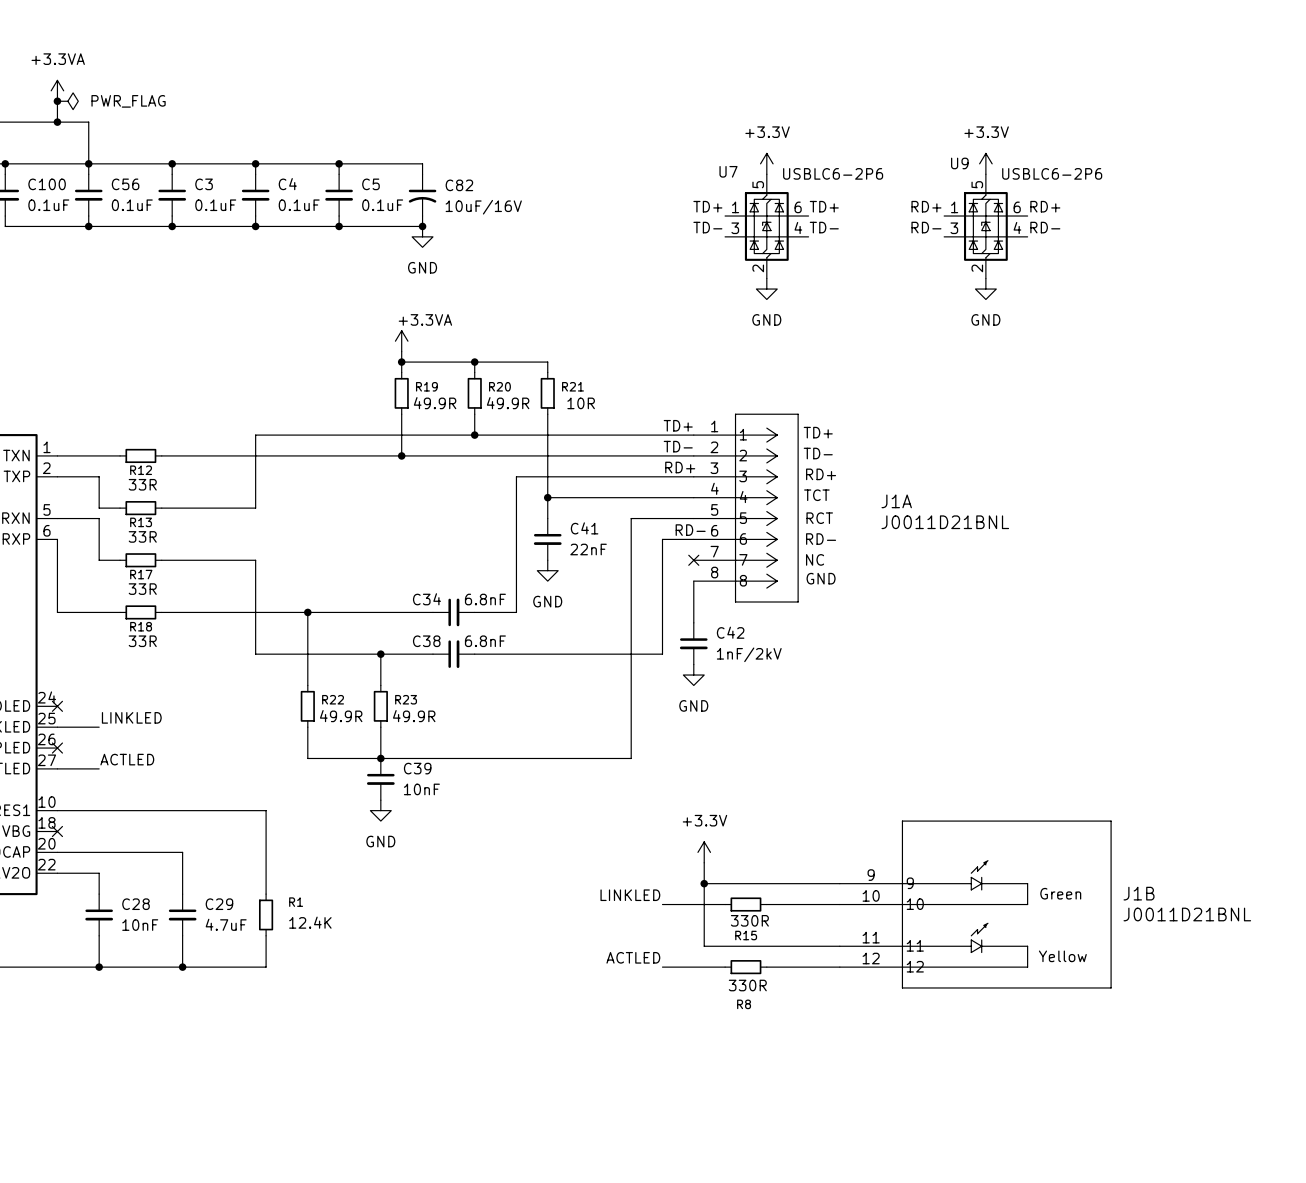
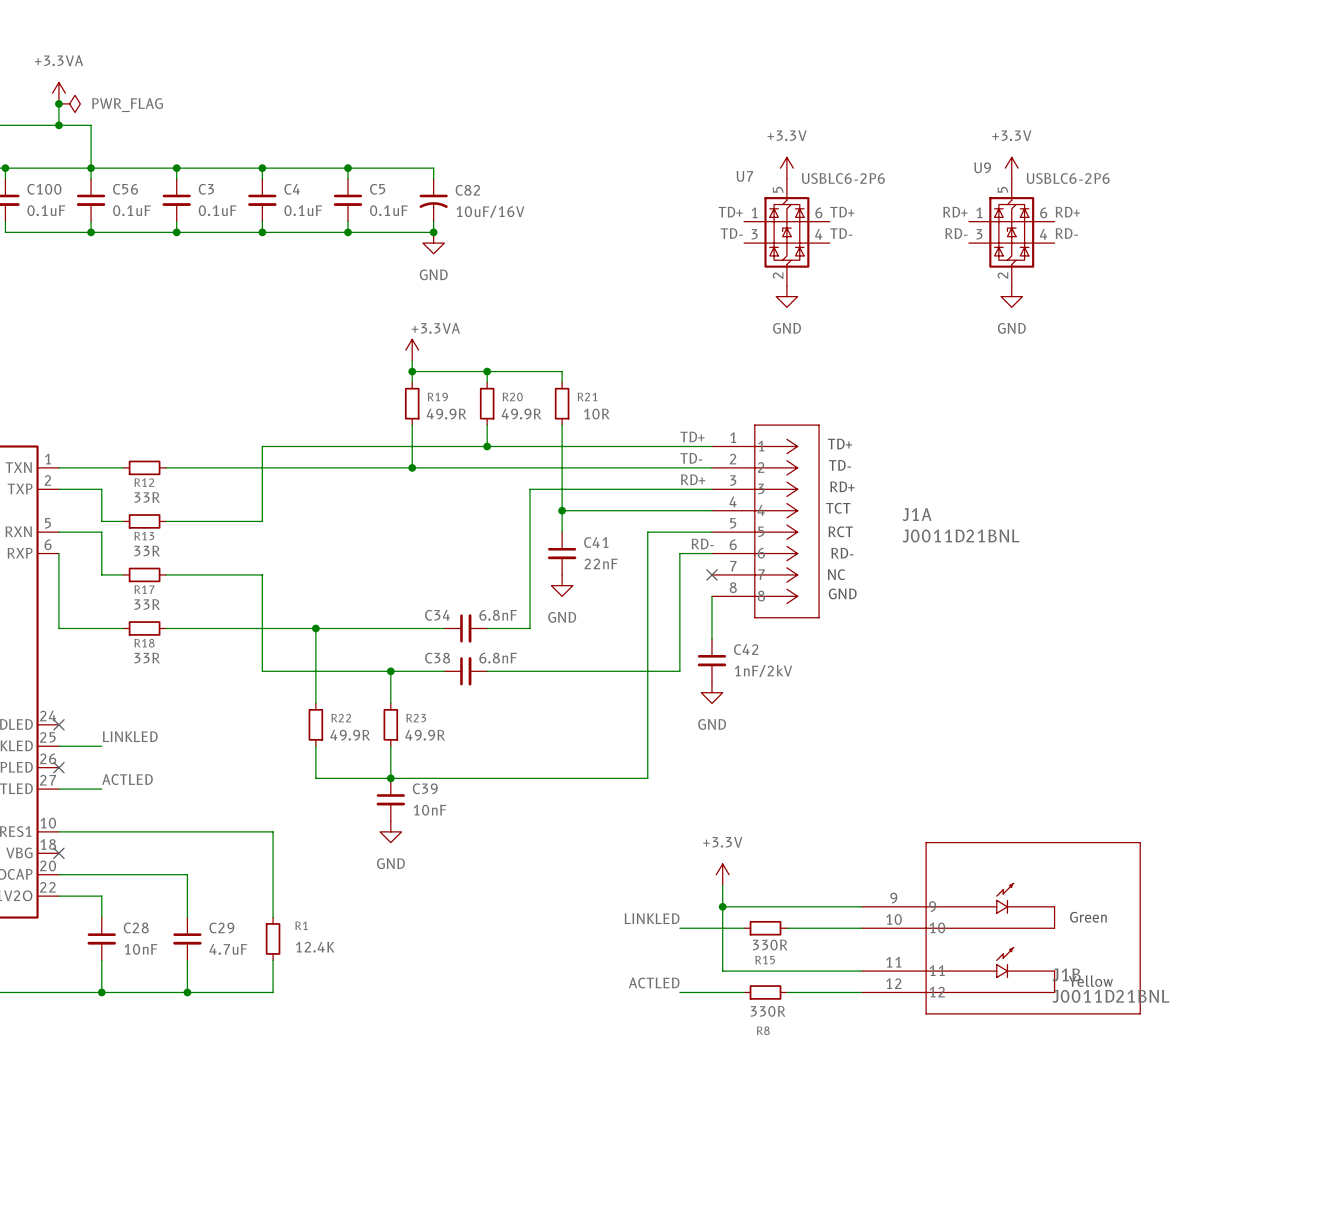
J1B name position: J1B (1139, 893) -> J1B (1066, 974)
J1B value position: J0011D21BNL (1187, 914) -> J0011D21BNL (1110, 996)

